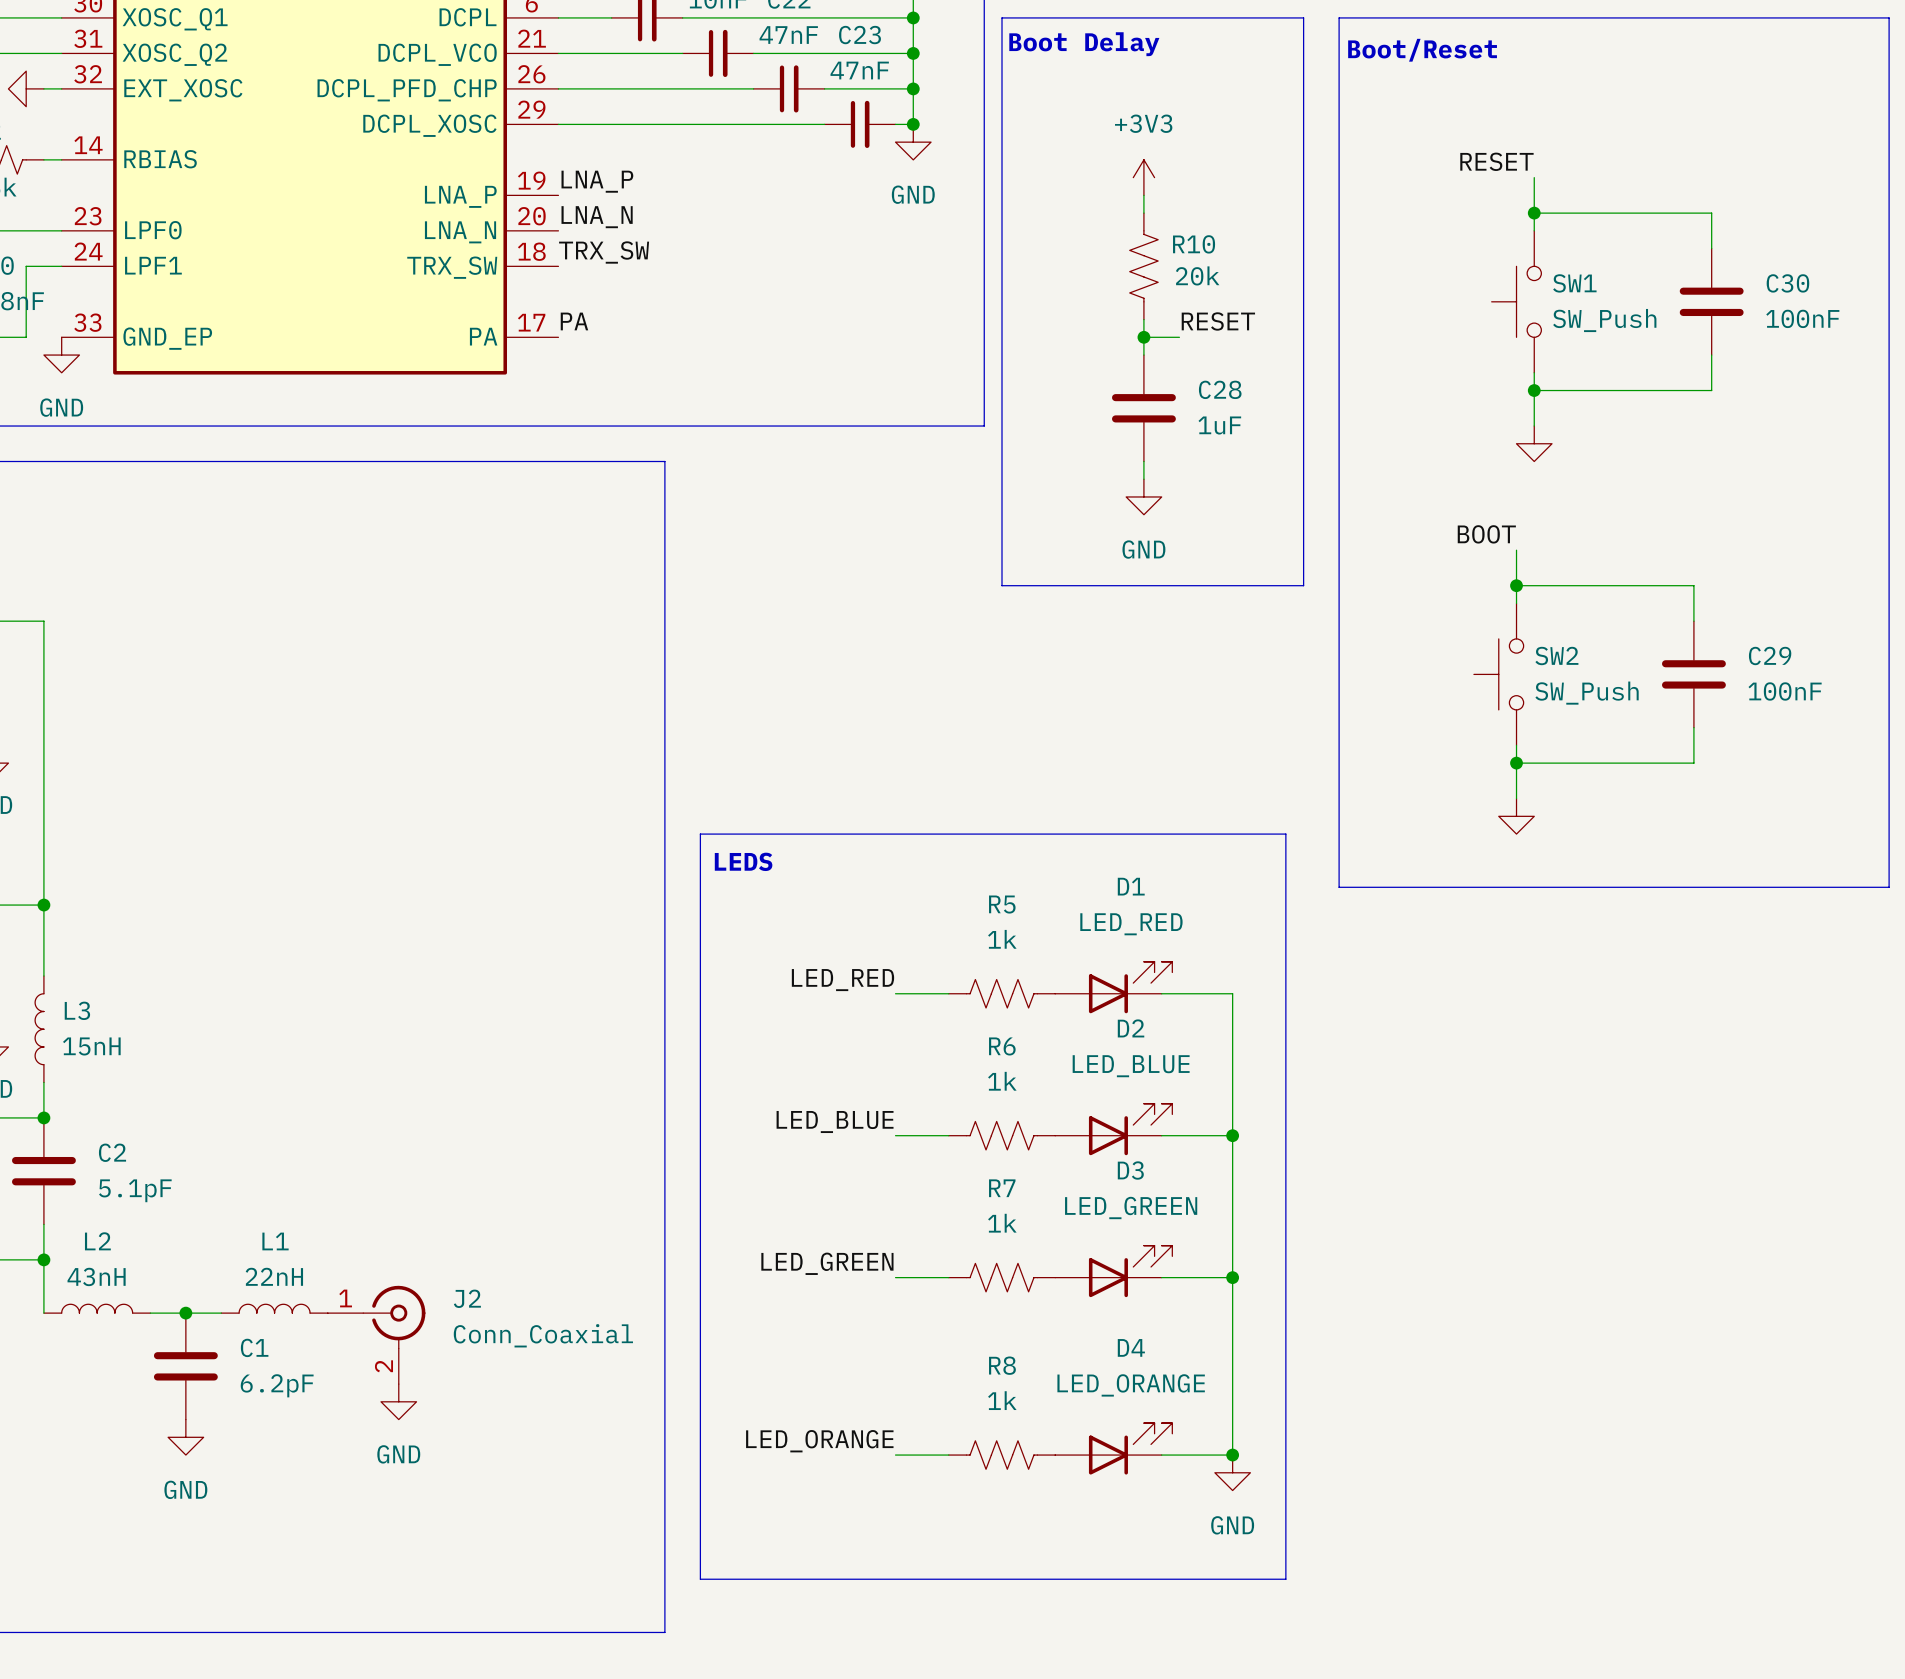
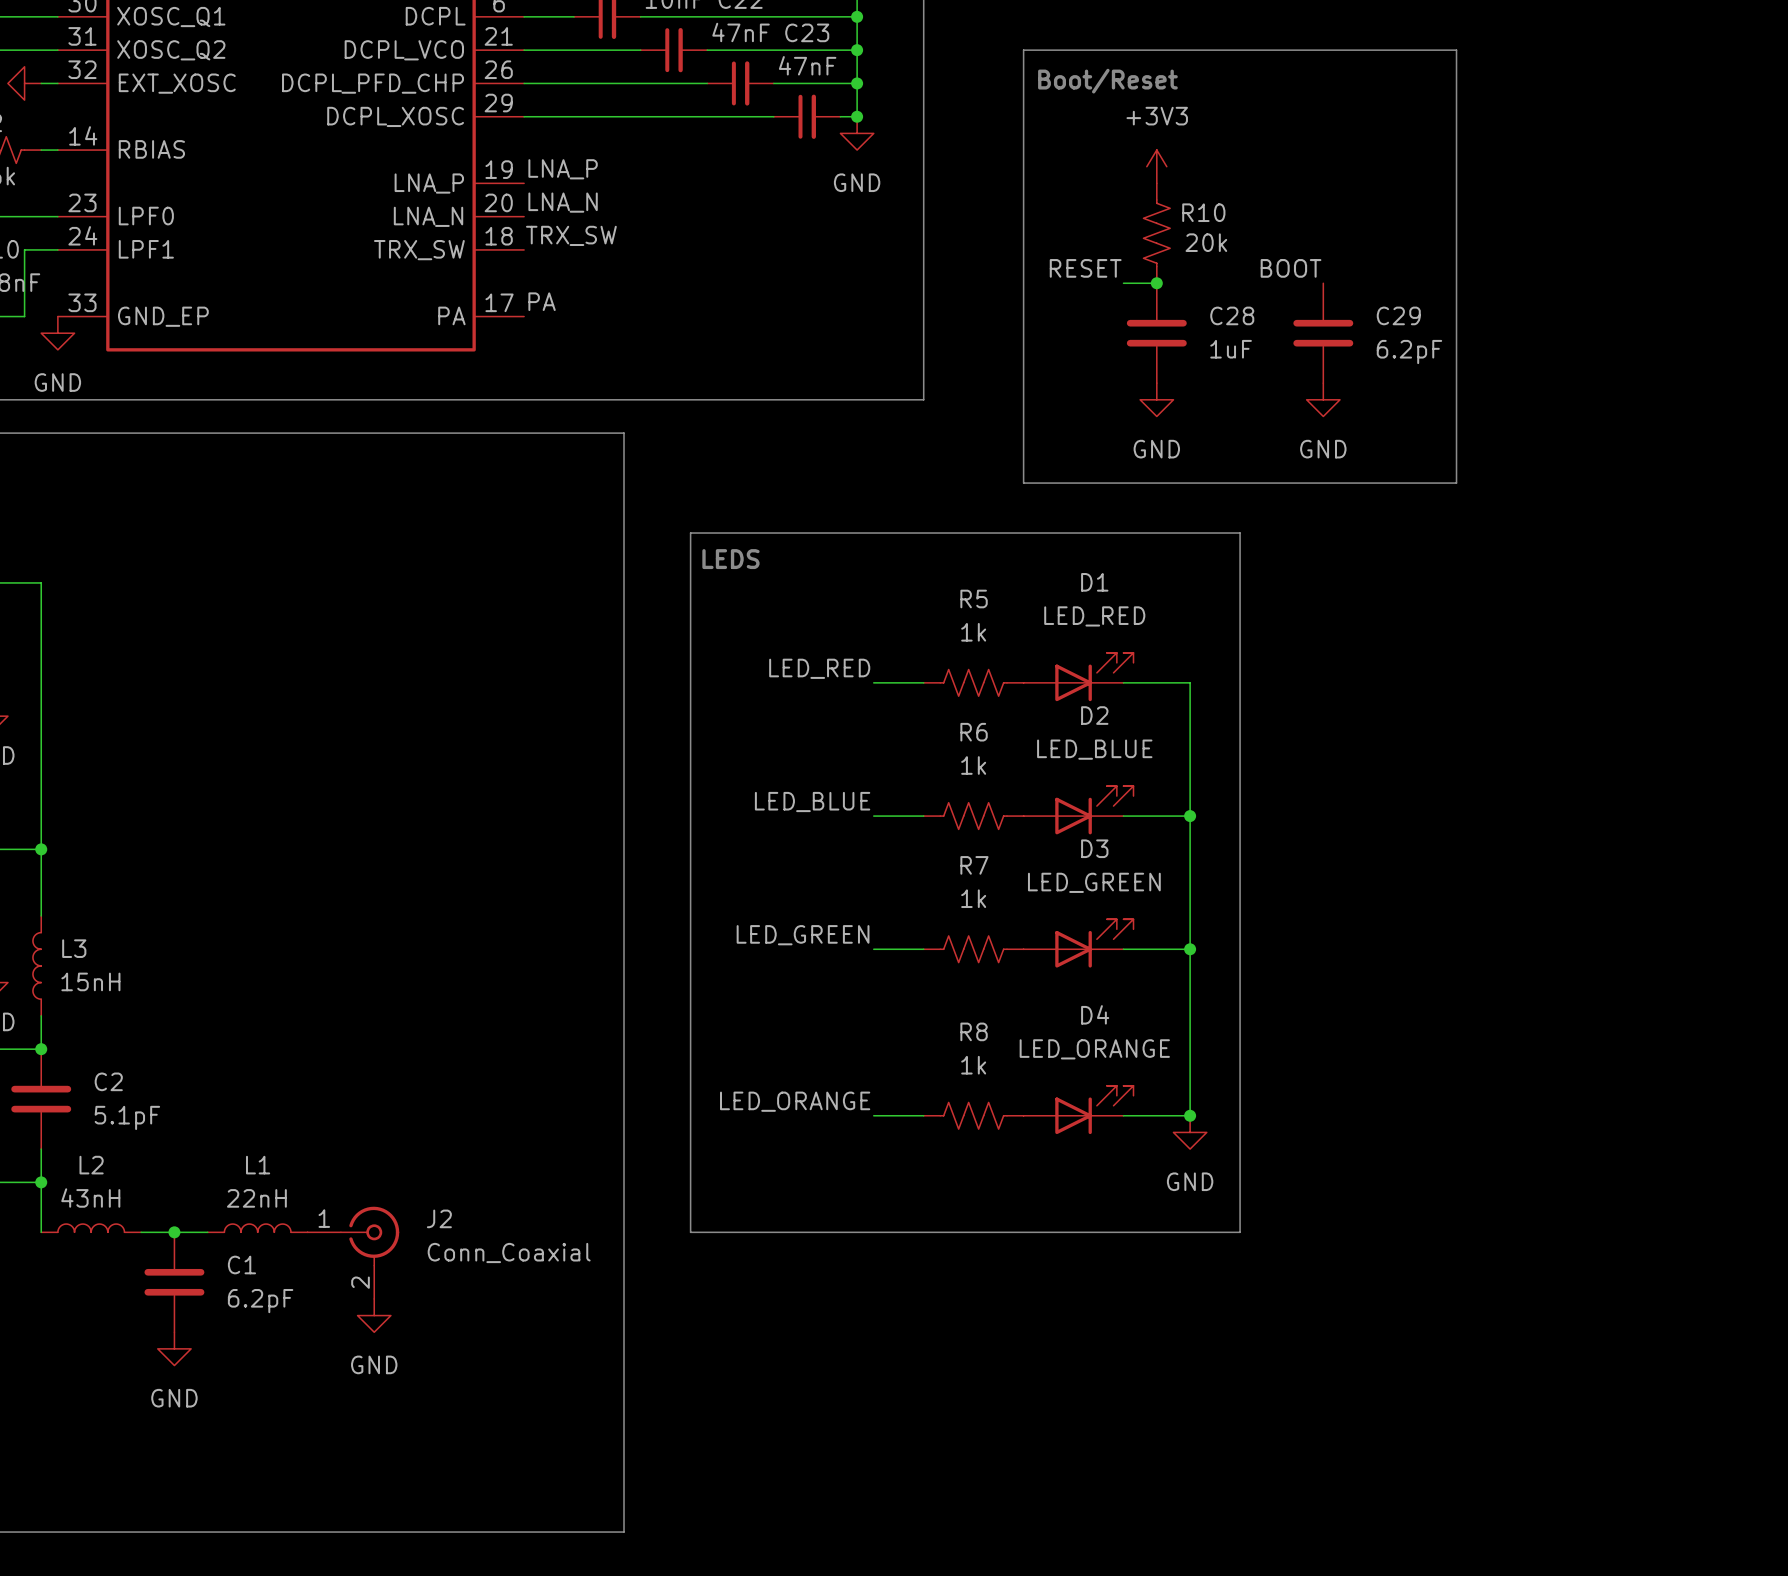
line: (1002, 17) (1303, 17) (1303, 585) (1002, 585) (1002, 17) -> none
line: (1339, 17) (1889, 17) (1889, 887) (1339, 887) (1339, 17) -> none
text: Boot Delay (1084, 44) -> none
text position: Boot/Reset (1422, 50) -> Boot/Reset (1107, 81)
line: none -> (1023, 50) (1456, 50) (1456, 483) (1023, 483) (1023, 50)
label: RESET (1496, 161) -> none
power symbol position: +3V3 (1143, 177) -> +3V3 (1156, 166)
wire: (1534, 177) (1534, 230) -> none
wire: (1143, 195) (1143, 213) -> none
wire: (1534, 213) (1711, 213) (1711, 248) -> none
junction: (1534, 213) -> none
R10 position: (1143, 266) -> (1156, 233)
junction: none -> (1156, 283)
SW1: SW_Push (1516, 301) -> none
C30: 100nF (1711, 301) -> none
wire: (1143, 319) (1143, 355) -> none
label position: RESET (1218, 321) -> RESET (1085, 268)
wire: (1143, 337) (1179, 337) -> (1123, 283) (1156, 283)
junction: (1143, 337) -> none
wire: (1711, 355) (1711, 390) (1534, 390) -> none
wire: (1534, 372) (1534, 426) -> none
junction: (1534, 390) -> none
C28 position: (1143, 408) -> (1156, 333)
power symbol: none -> GND (1323, 399)
power symbol: (1534, 443) -> none
wire: (1143, 461) (1143, 479) -> none
power symbol position: GND (1143, 496) -> GND (1156, 399)
label position: BOOT (1486, 534) -> BOOT (1291, 268)
wire: (1516, 550) (1516, 603) -> none
wire: (1516, 585) (1693, 585) (1693, 621) -> none
junction: (1516, 585) -> none
SW2: SW_Push (1498, 674) -> none
C29 position: (1693, 674) -> (1323, 333)
C29 value: 100nF (1785, 691) -> 6.2pF (1409, 352)
wire: (1693, 727) (1693, 763) (1516, 763) -> none
wire: (1516, 745) (1516, 798) -> none
junction: (1516, 763) -> none
power symbol: (1516, 816) -> none
line: (700, 834) (1285, 834) (1285, 1579) (700, 1579) (700, 834) -> (690, 533) (1240, 533) (1240, 1232) (690, 1232) (690, 533)
text position: LEDS (743, 861) -> LEDS (730, 559)
junction: none -> (1190, 816)
label position: LED_RED (842, 980) -> LED_RED (819, 668)
D1 position: (1113, 987) -> (1078, 677)
wire: (895, 993) (948, 993) -> (873, 682) (923, 682)
R5 position: (1002, 993) -> (973, 682)
wire: (1161, 993) (1232, 993) (1232, 1455) (1161, 1455) -> (1123, 682) (1190, 682) (1190, 1115) (1123, 1115)
junction: none -> (1190, 949)
label position: LED_BLUE (835, 1122) -> LED_BLUE (812, 802)
D2 position: (1113, 1129) -> (1078, 810)
wire: (895, 1135) (948, 1135) -> (873, 816) (923, 816)
R6 position: (1002, 1135) -> (973, 816)
wire: (1161, 1135) (1232, 1135) -> (1123, 816) (1190, 816)
junction: (1232, 1135) -> none
junction: none -> (1190, 1115)
label position: LED_GREEN (827, 1263) -> LED_GREEN (803, 935)
D3 position: (1113, 1271) -> (1078, 943)
wire: (895, 1277) (948, 1277) -> (873, 949) (923, 949)
R7 position: (1002, 1277) -> (973, 949)
wire: (1161, 1277) (1232, 1277) -> (1123, 949) (1190, 949)
junction: (1232, 1277) -> none
label position: LED_ORANGE (819, 1441) -> LED_ORANGE (795, 1101)
D4 position: (1113, 1448) -> (1078, 1109)
wire: (895, 1455) (948, 1455) -> (873, 1115) (923, 1115)
R8 position: (1002, 1455) -> (973, 1115)
junction: (1232, 1455) -> none
power symbol position: GND (1232, 1472) -> GND (1190, 1132)

